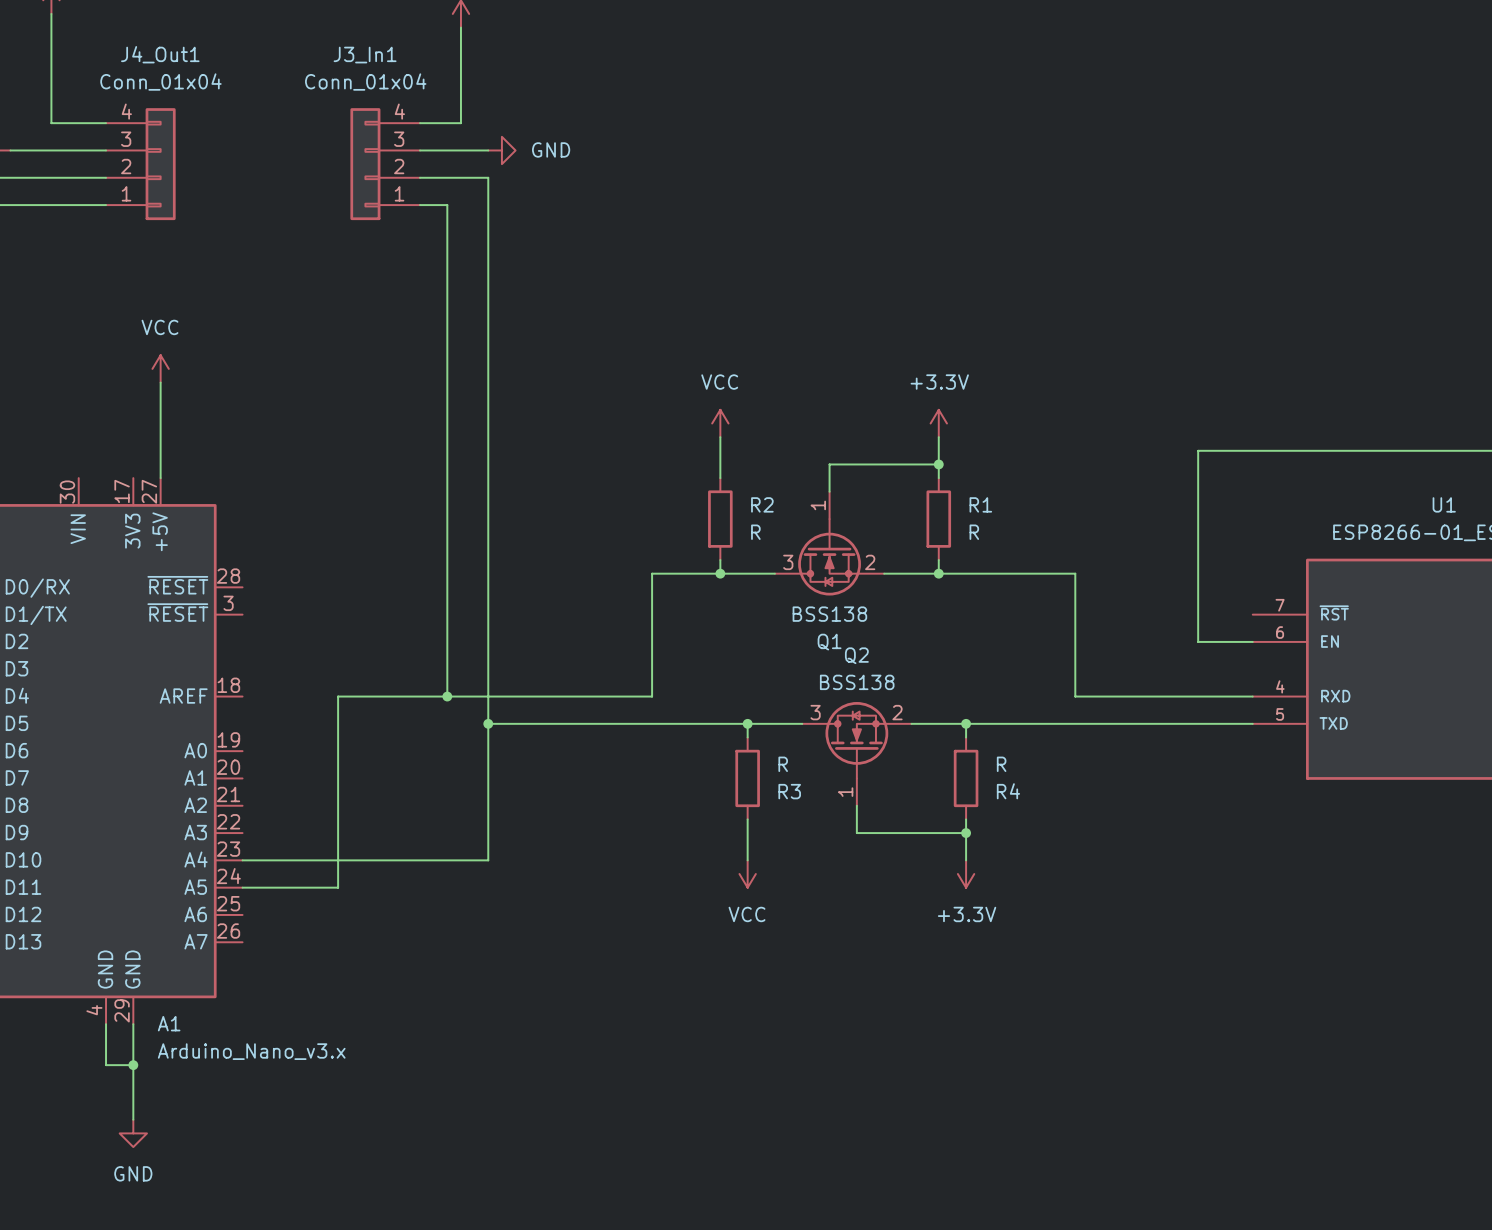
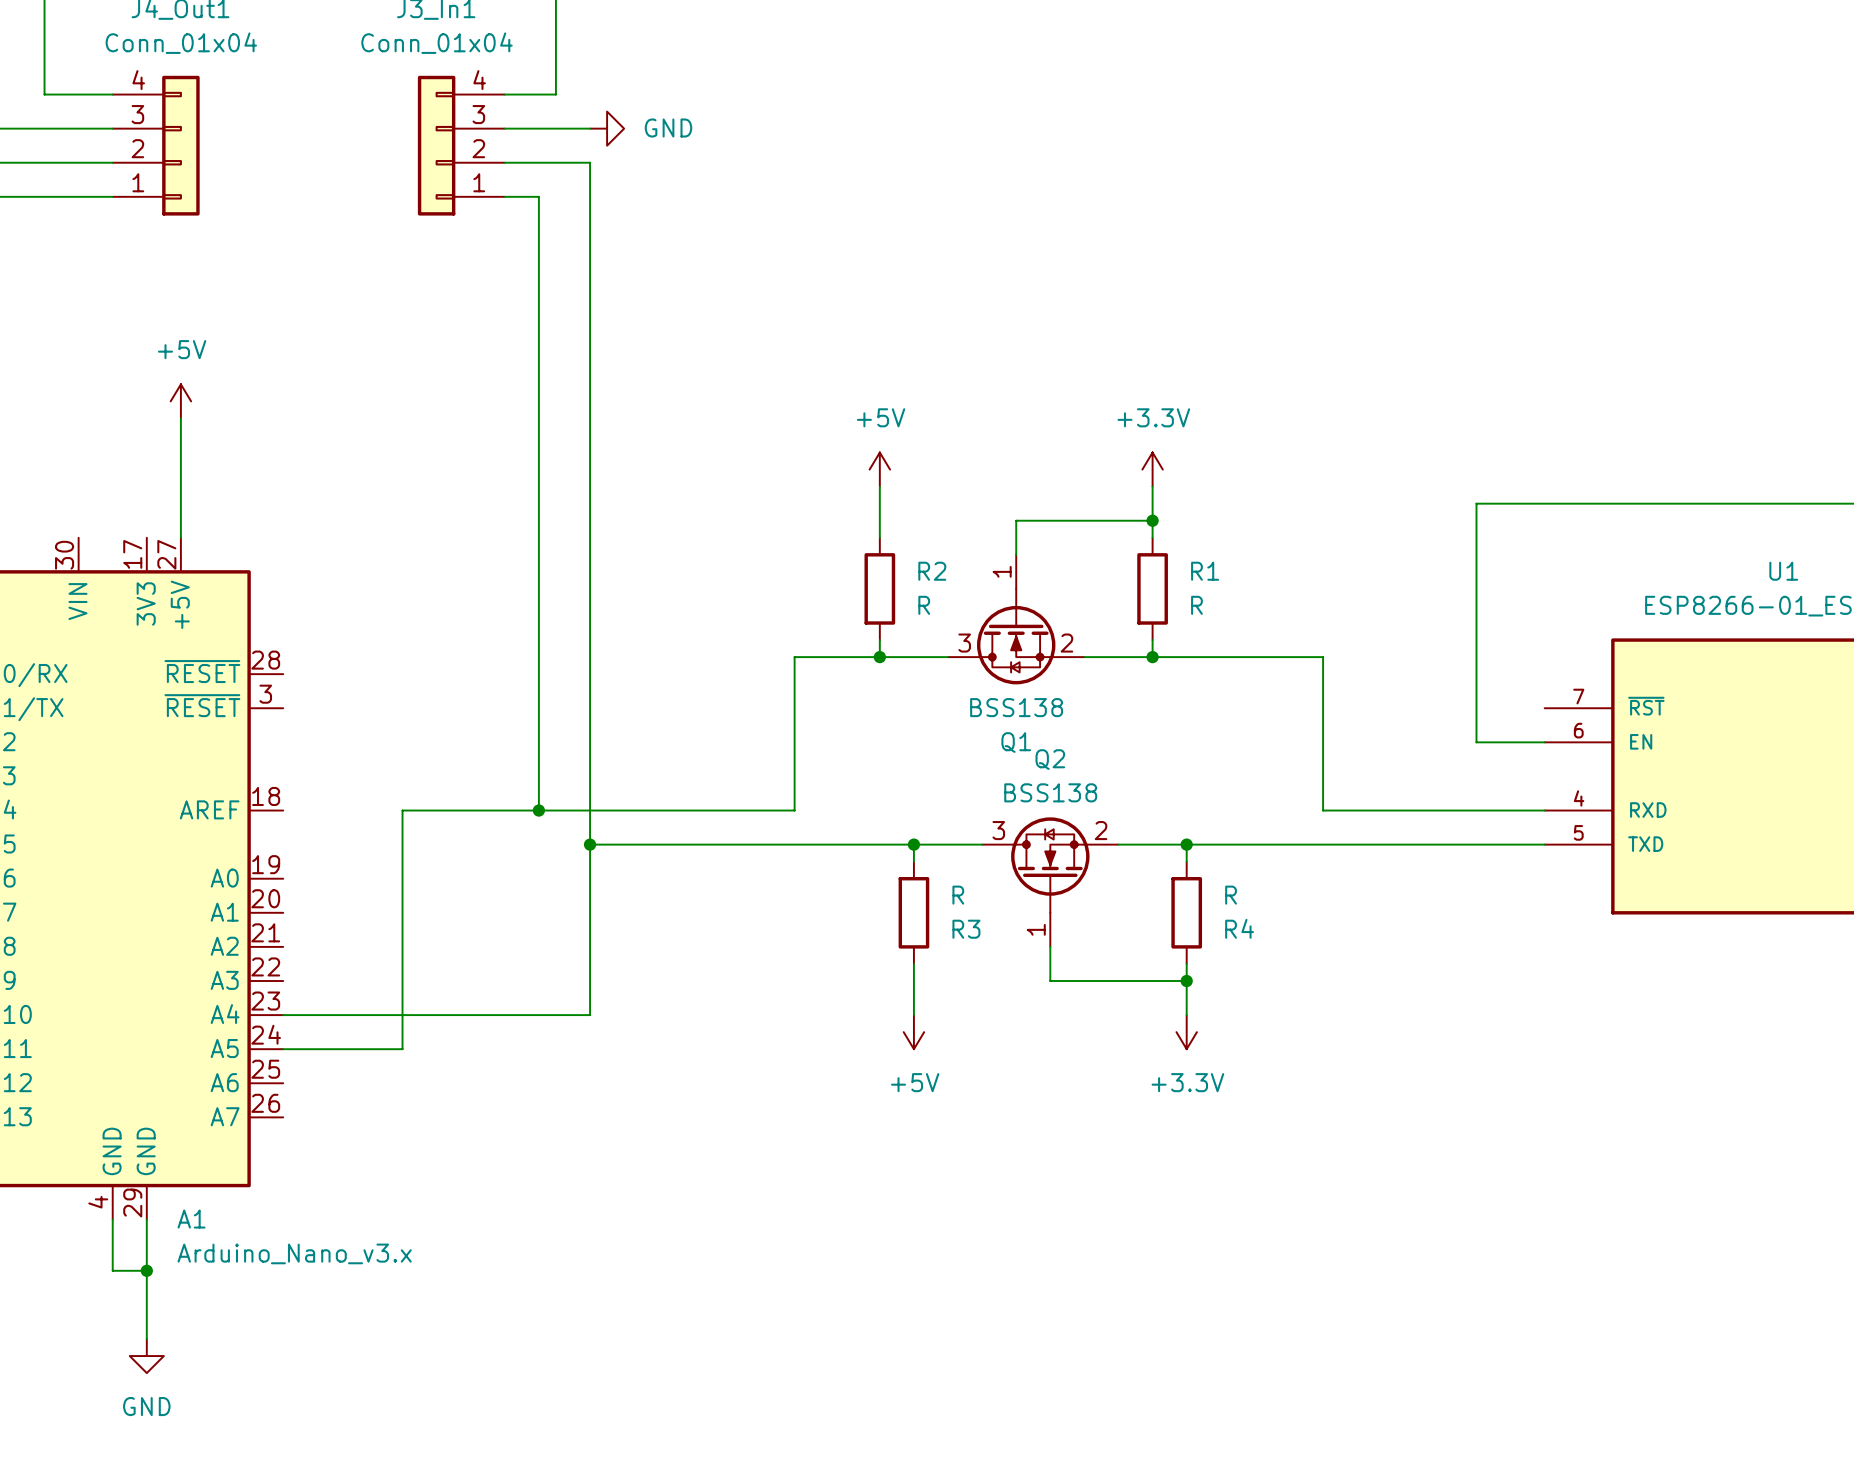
power symbol: VCC (160, 368) -> +5V (180, 401)
power symbol: VCC (720, 423) -> +5V (879, 469)
power symbol: VCC (747, 874) -> +5V (913, 1032)

